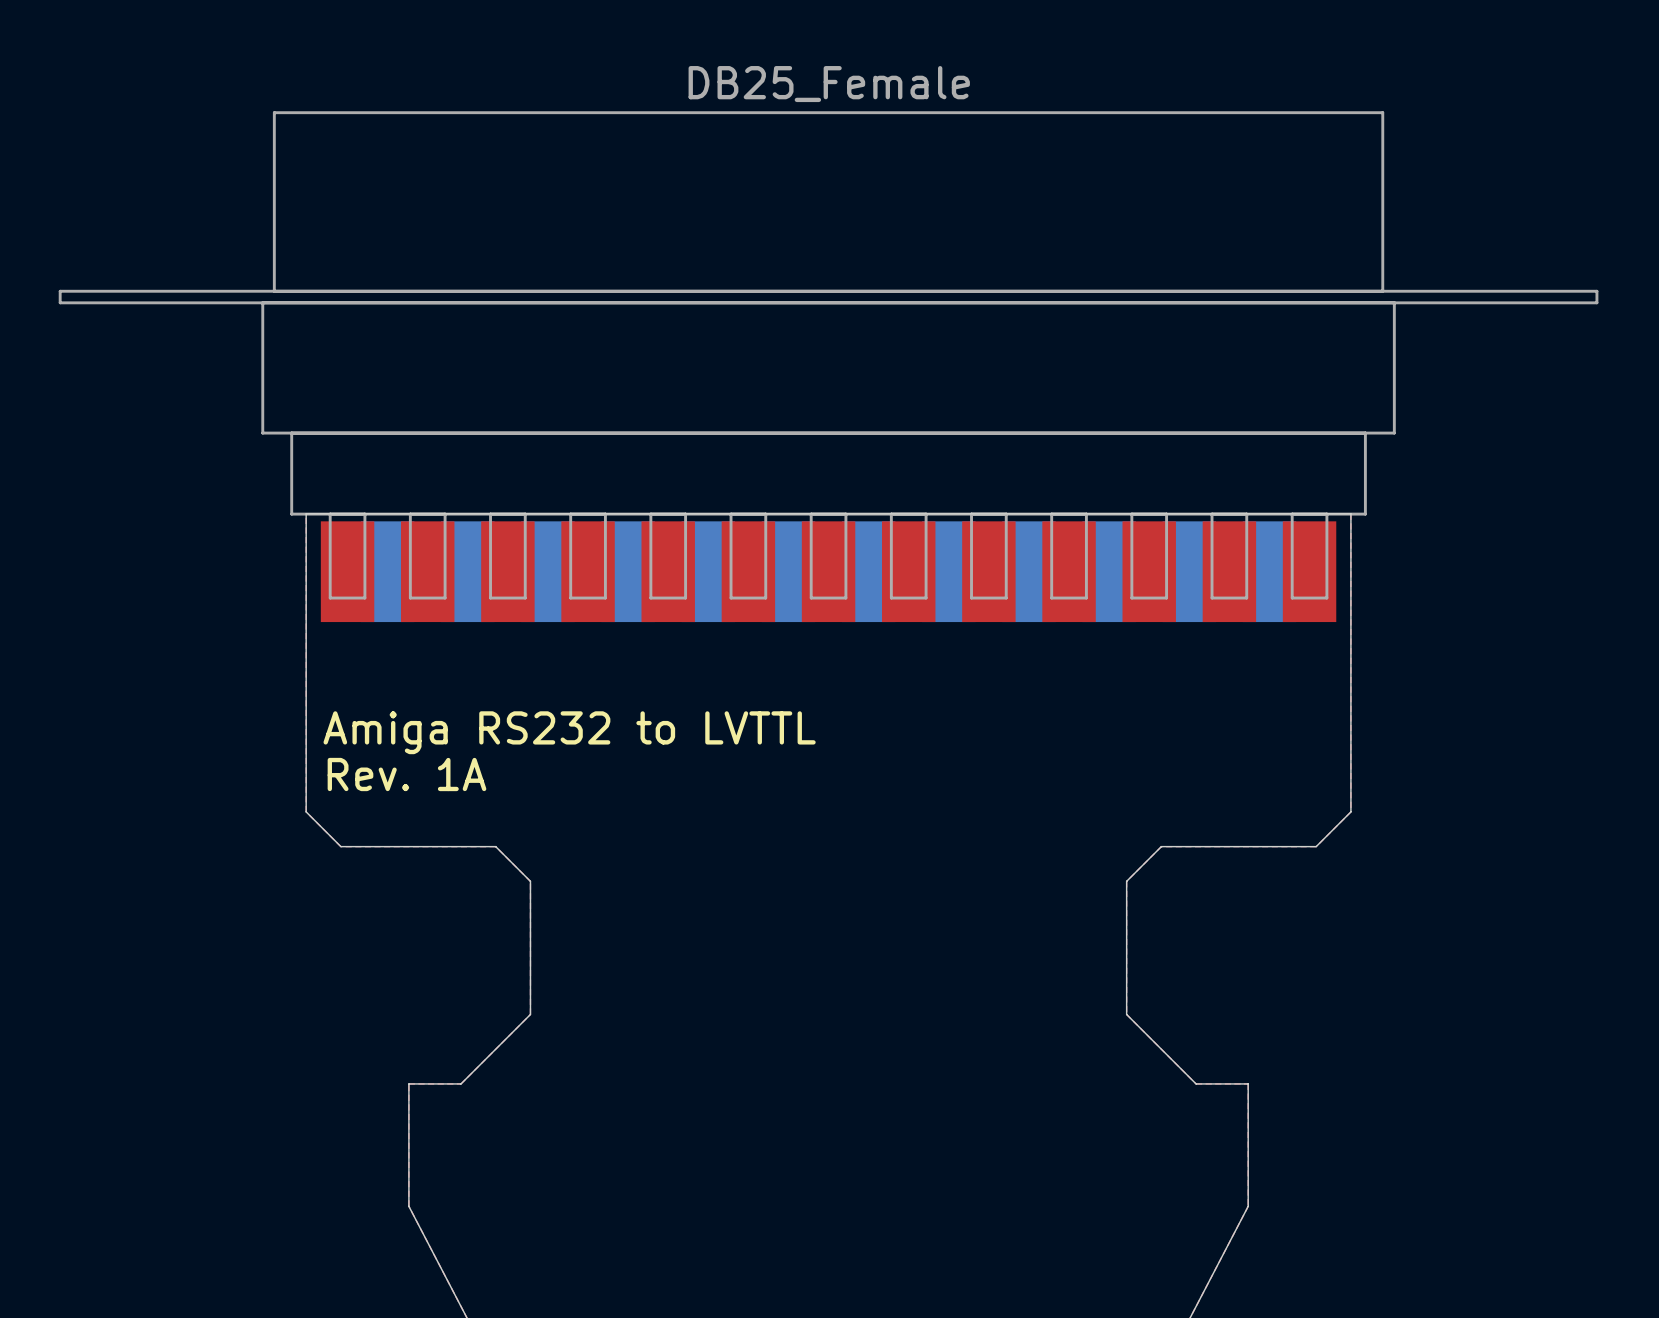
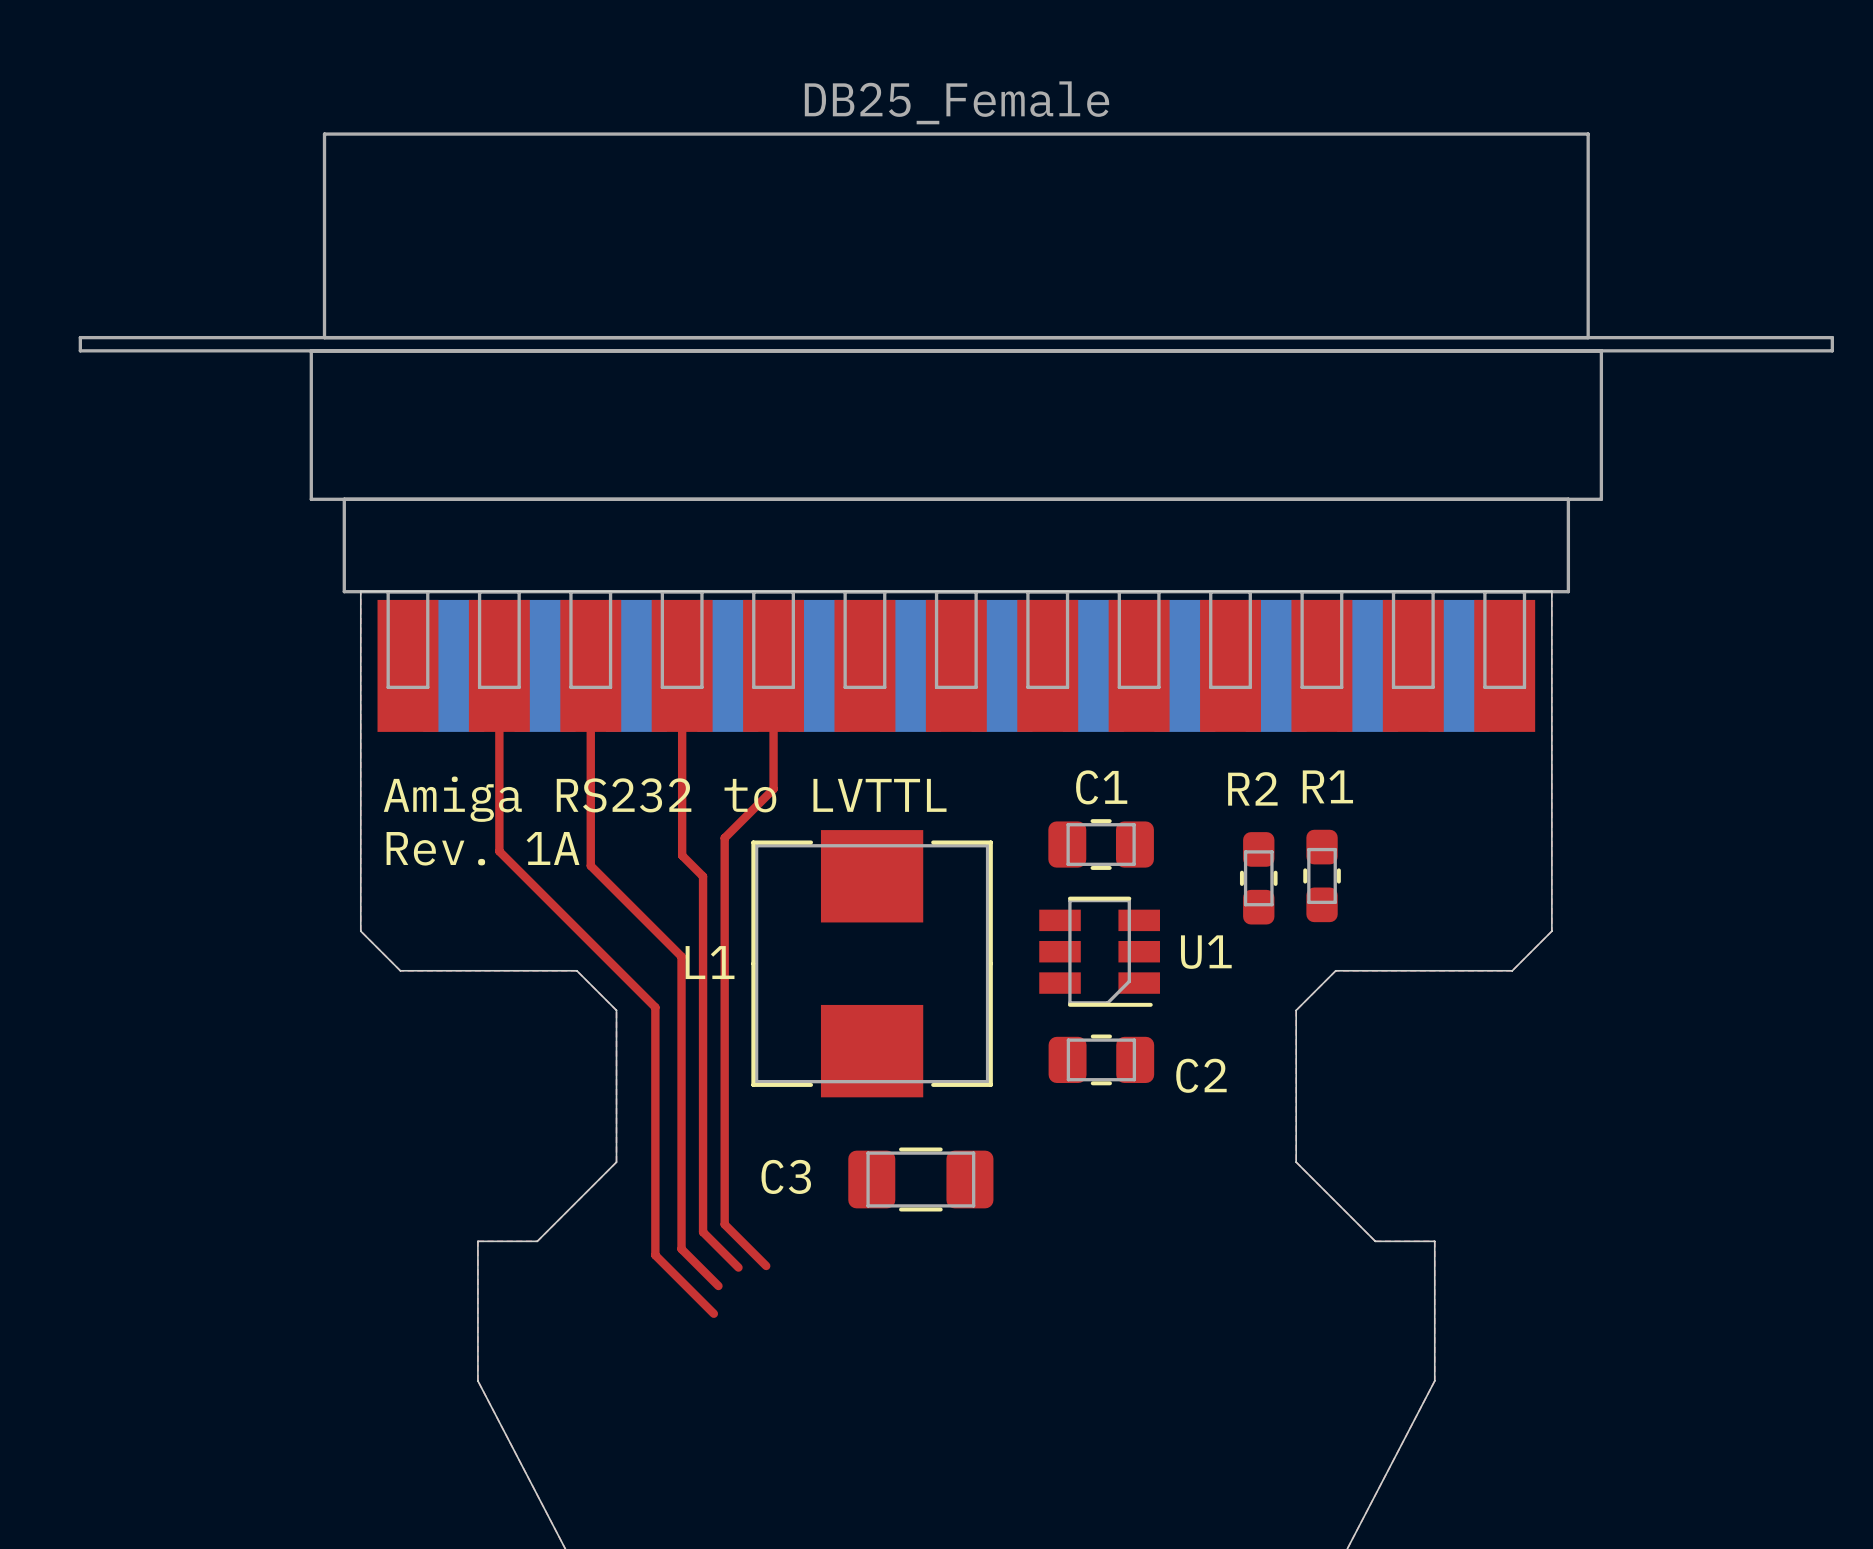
part footprint: [58, 111, 1599, 623] -> [78, 132, 1834, 732]
top track: none -> (499, 657) (499, 851) (655, 1007) (655, 1255) (713, 1313)
top track: none -> (590, 657) (590, 865) (681, 956) (681, 1249) (718, 1286)
top track: none -> (682, 657) (682, 855) (703, 876) (703, 1232) (738, 1267)
top track: none -> (773, 657) (773, 789) (724, 837) (724, 1224) (766, 1265)
text position: Amiga RS232 to LVTTL (569, 732) -> Amiga RS232 to LVTTL (665, 799)
C1: none -> (1101, 844)
R1: none -> (1322, 875)
R2: none -> (1258, 878)
text position: Rev. 1A (406, 774) -> Rev. 1A (483, 848)
U1: none -> (1099, 951)
L1: none -> (872, 963)
C2: none -> (1101, 1059)
C3: none -> (920, 1179)

